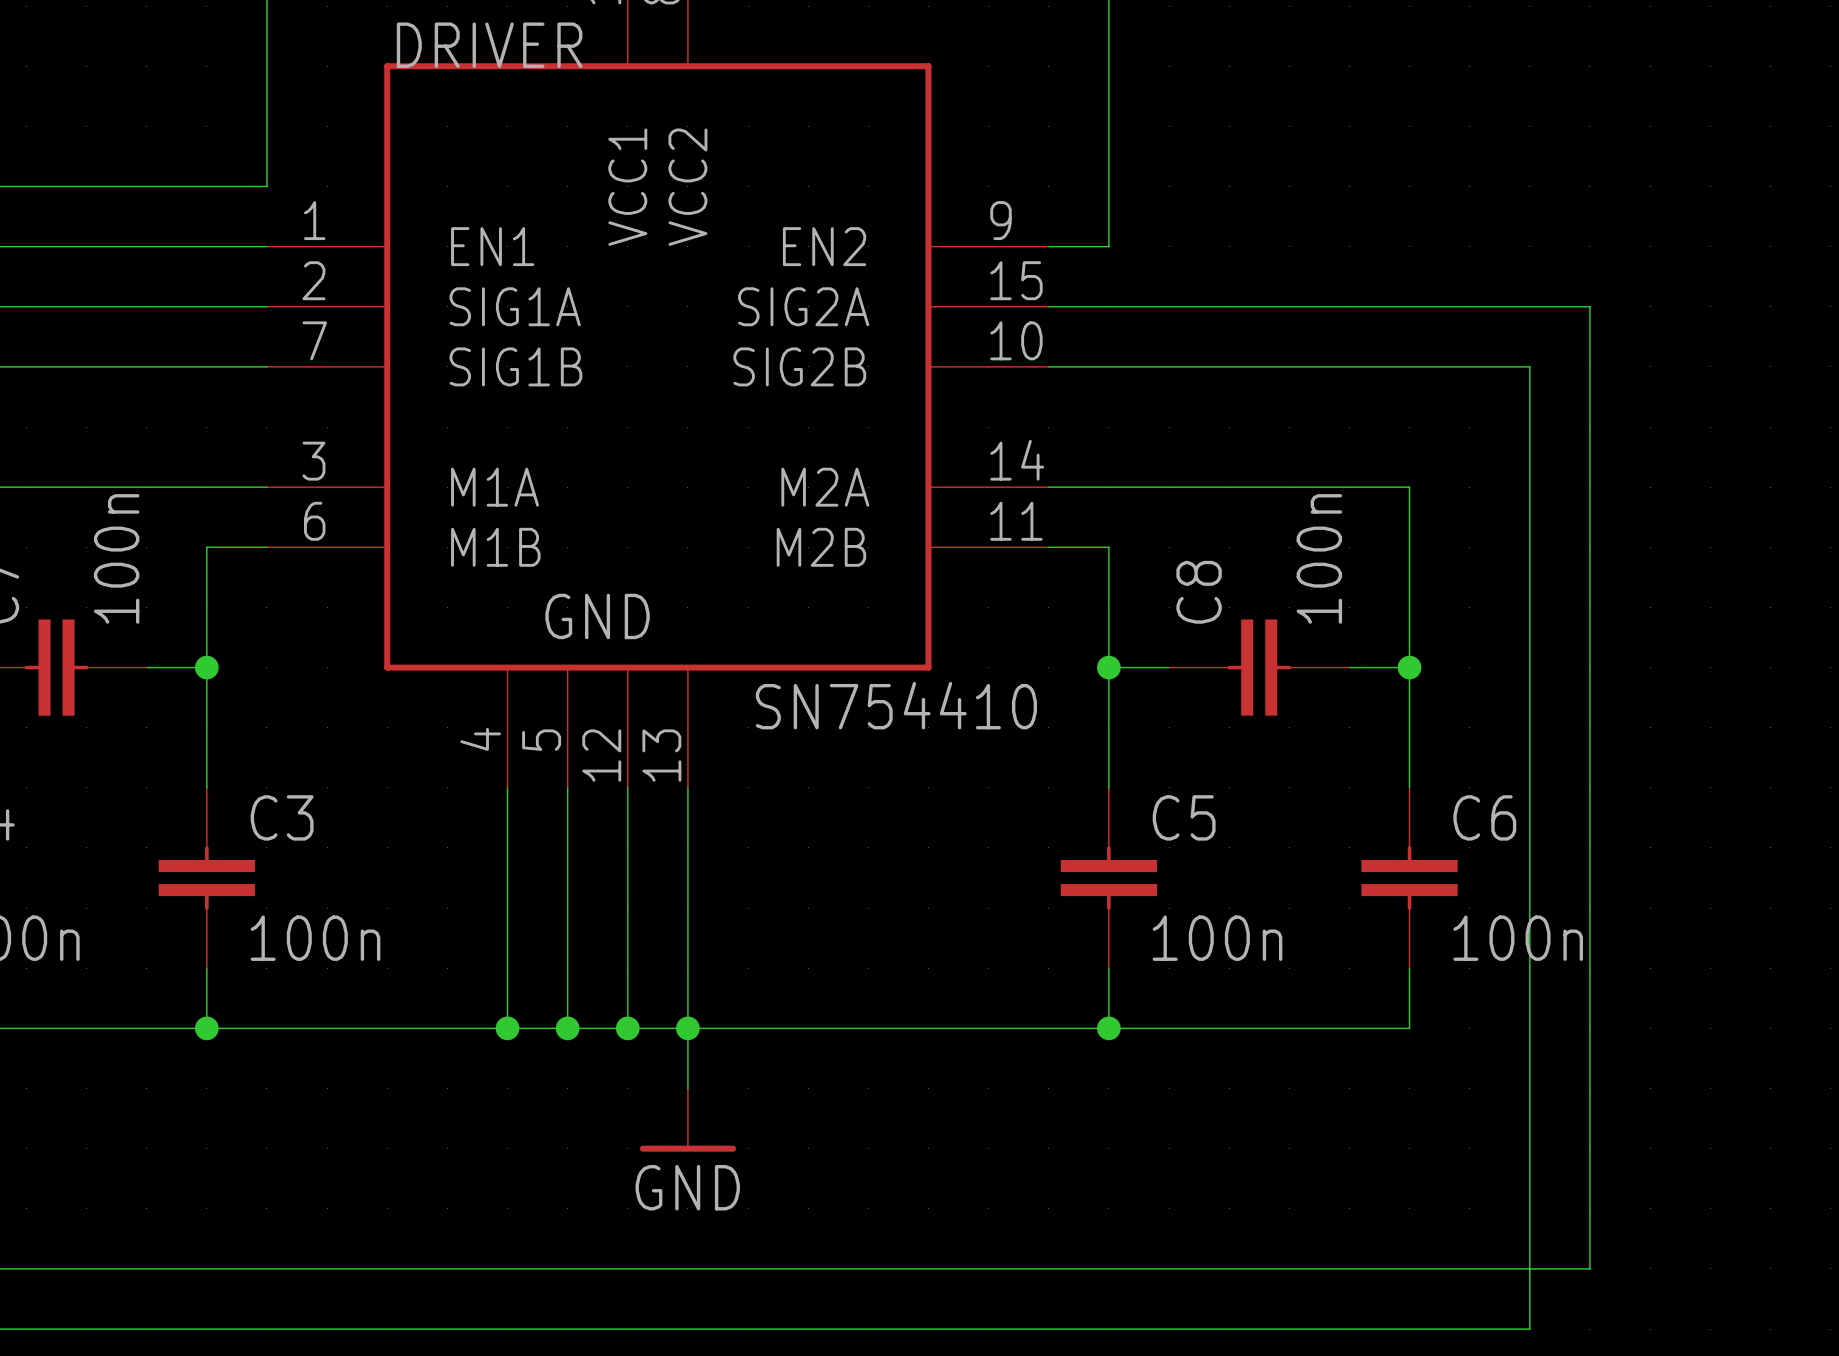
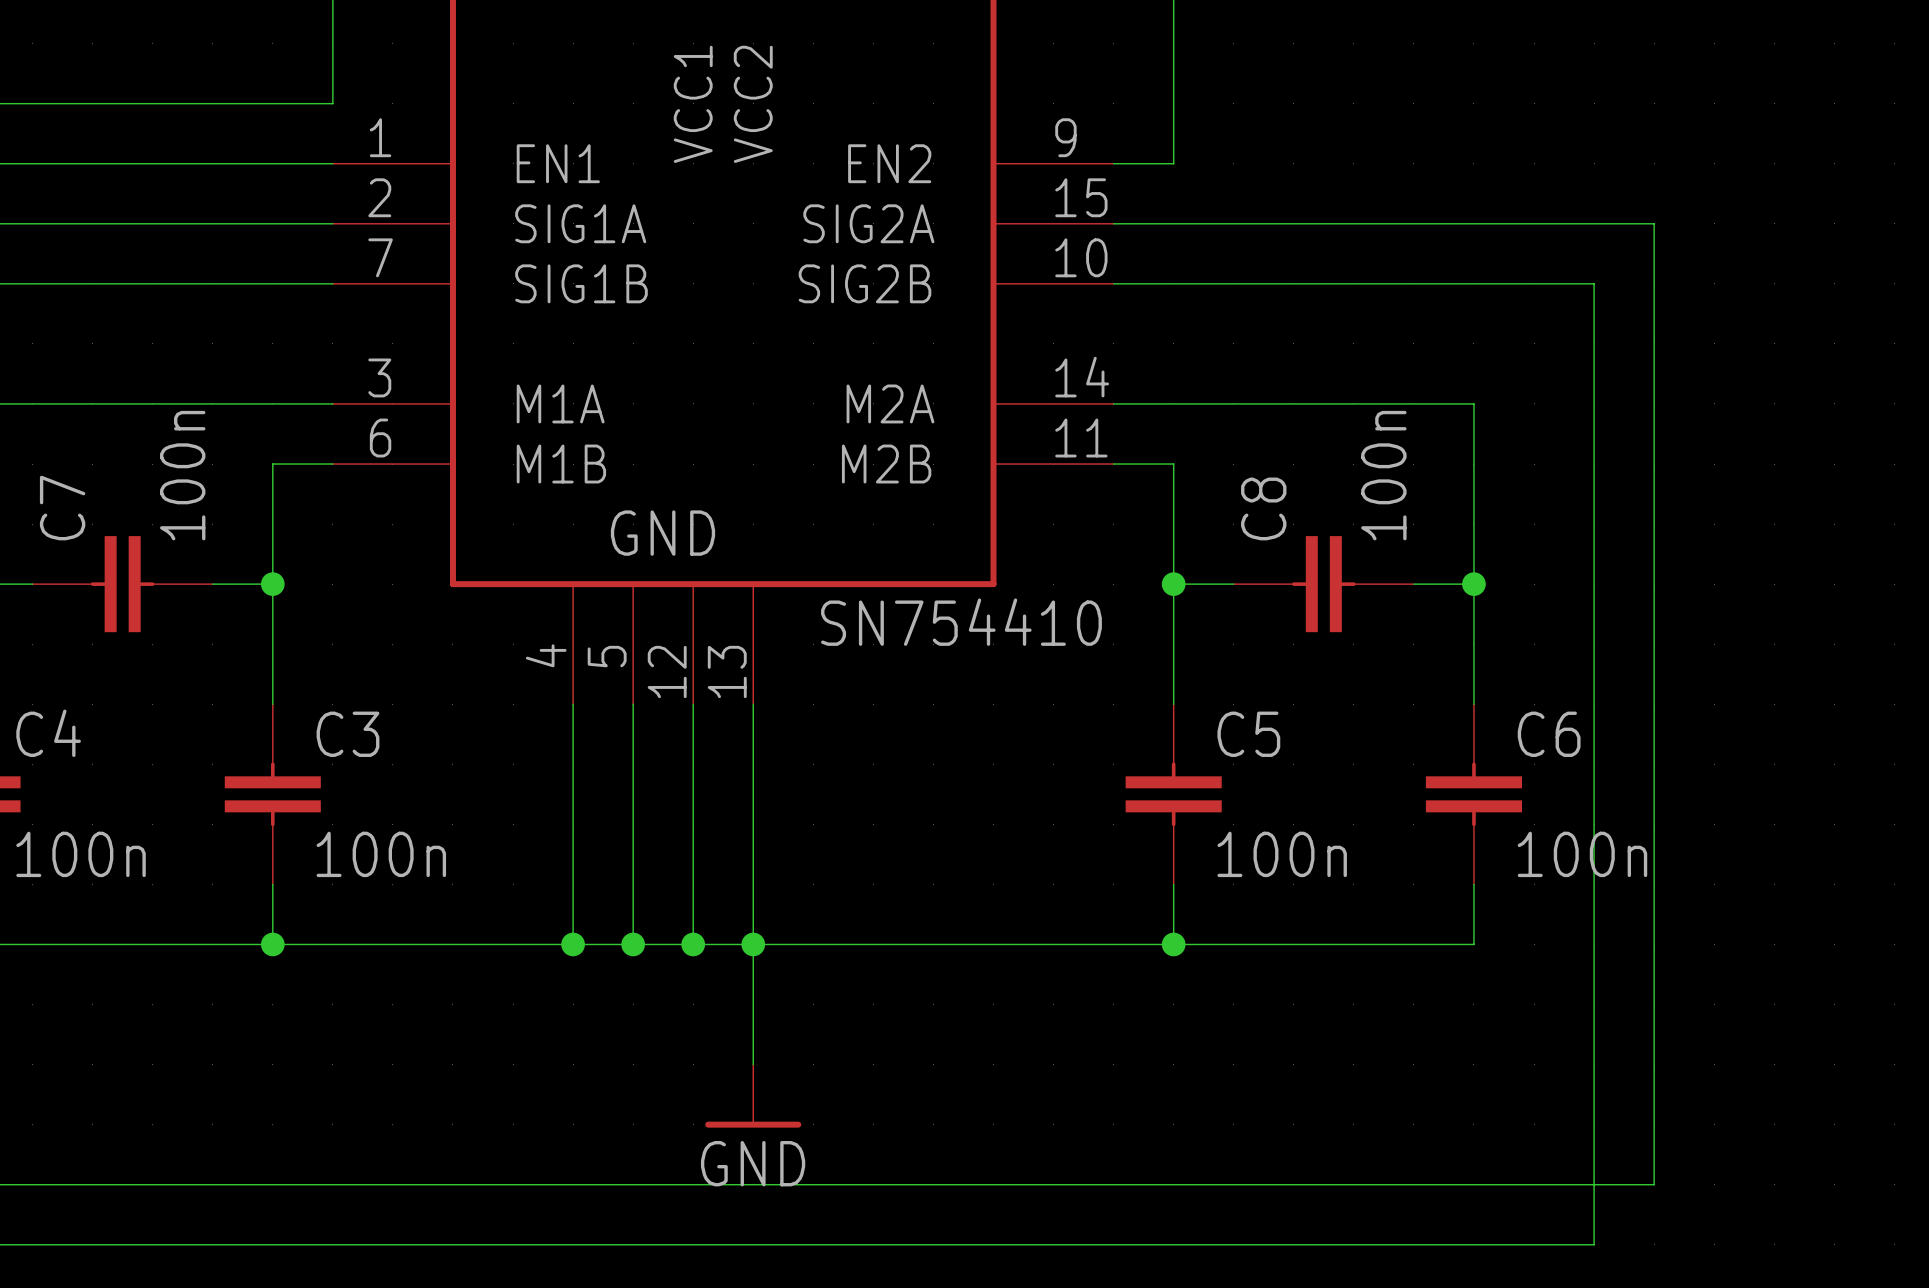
power symbol position: GND (687, 1120) -> GND (753, 1096)

